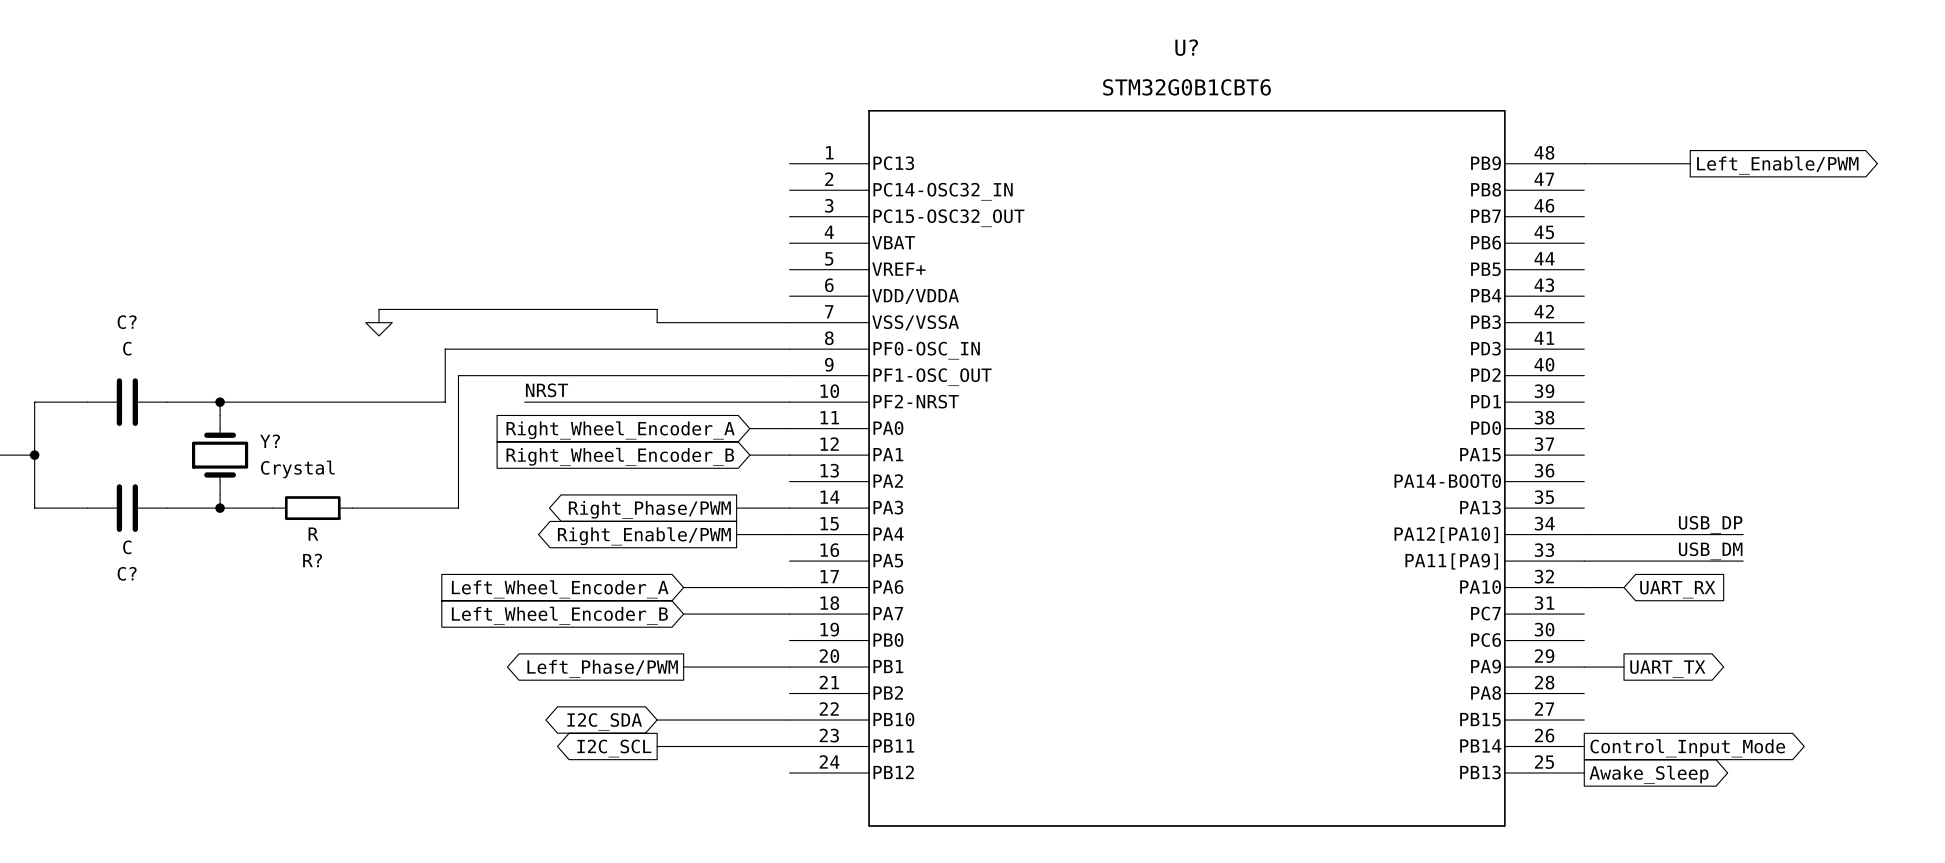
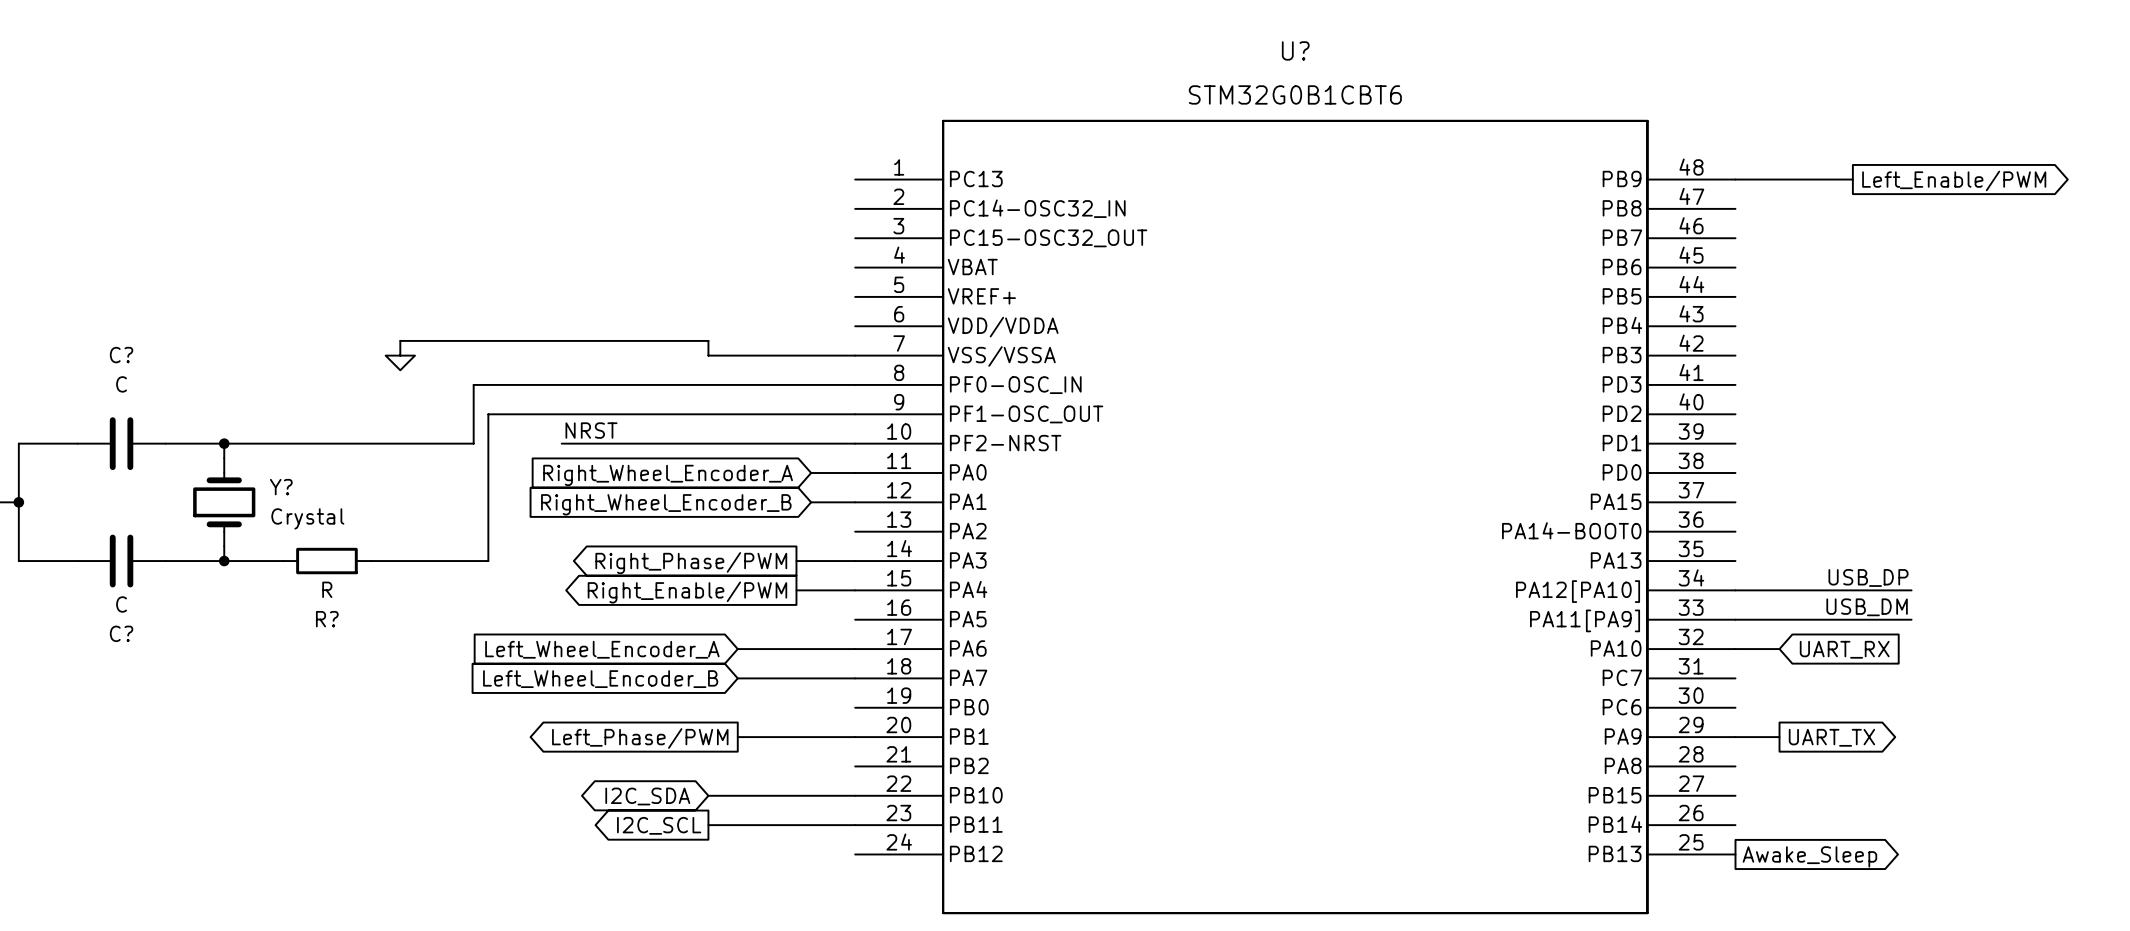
global label: Control_Input_Mode (1687, 748) -> none

